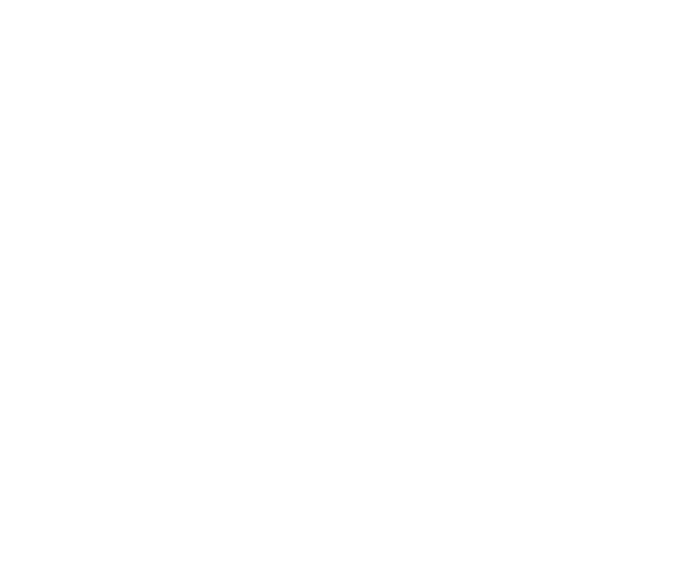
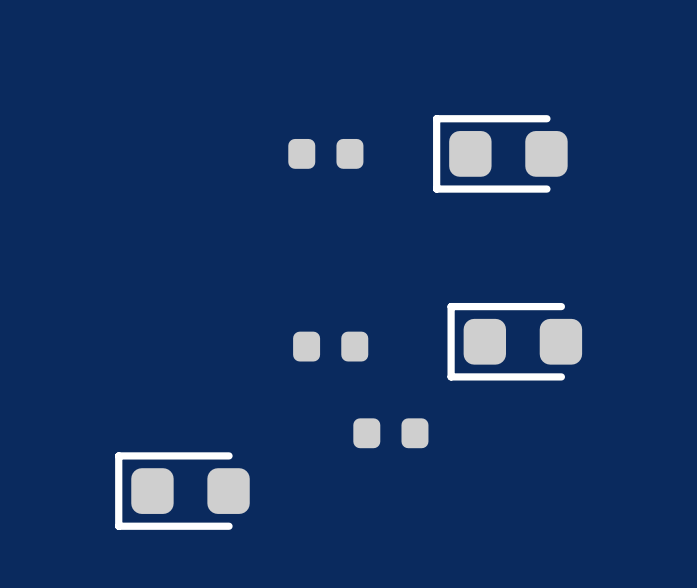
part: none -> (325, 153)
part: none -> (500, 153)
part: none -> (514, 341)
part: none -> (330, 346)
part: none -> (390, 433)
part: none -> (182, 491)

